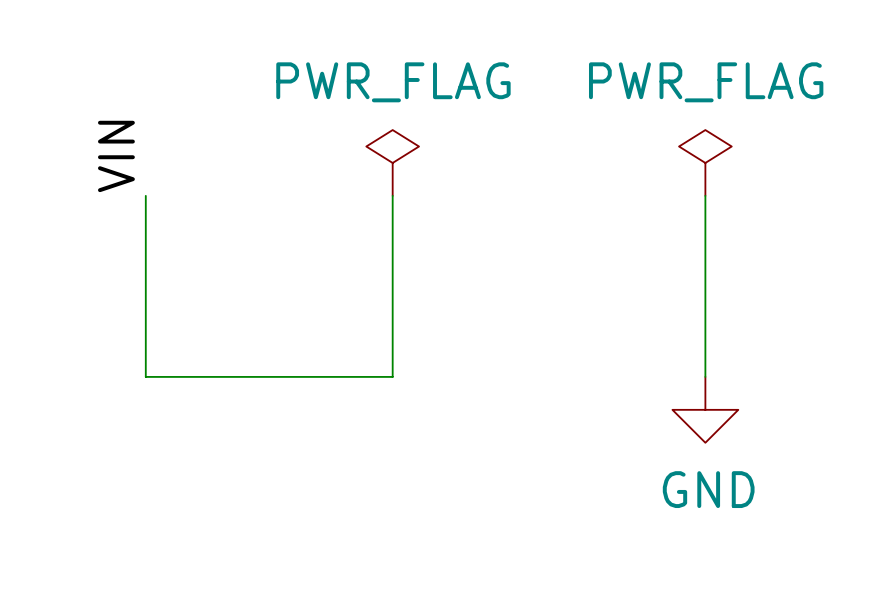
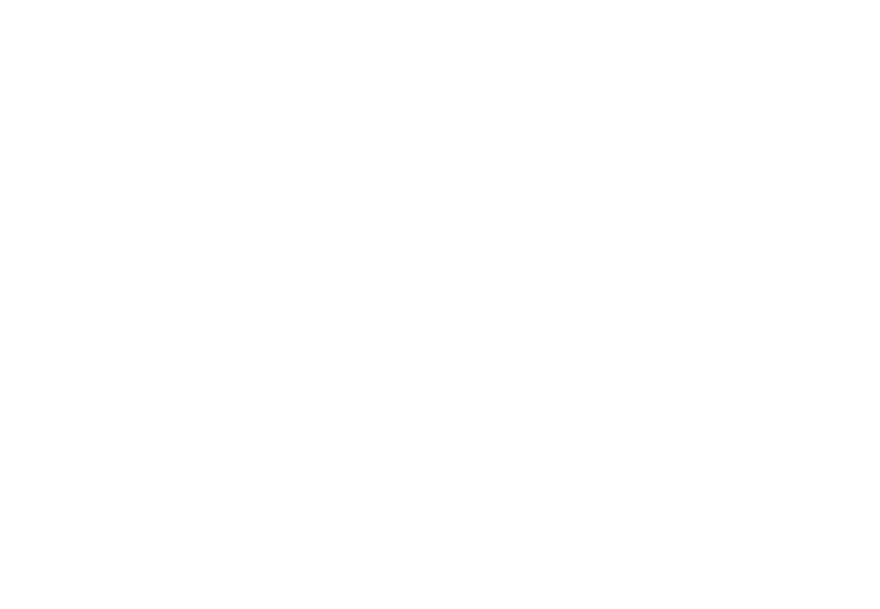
label: VIN (116, 156) -> none
power symbol: PWR_FLAG (392, 162) -> none
power symbol: PWR_FLAG (705, 162) -> none
wire: (145, 195) (145, 376) (392, 376) (392, 195) -> none
wire: (705, 195) (705, 376) -> none
power symbol: GND (705, 409) -> none

